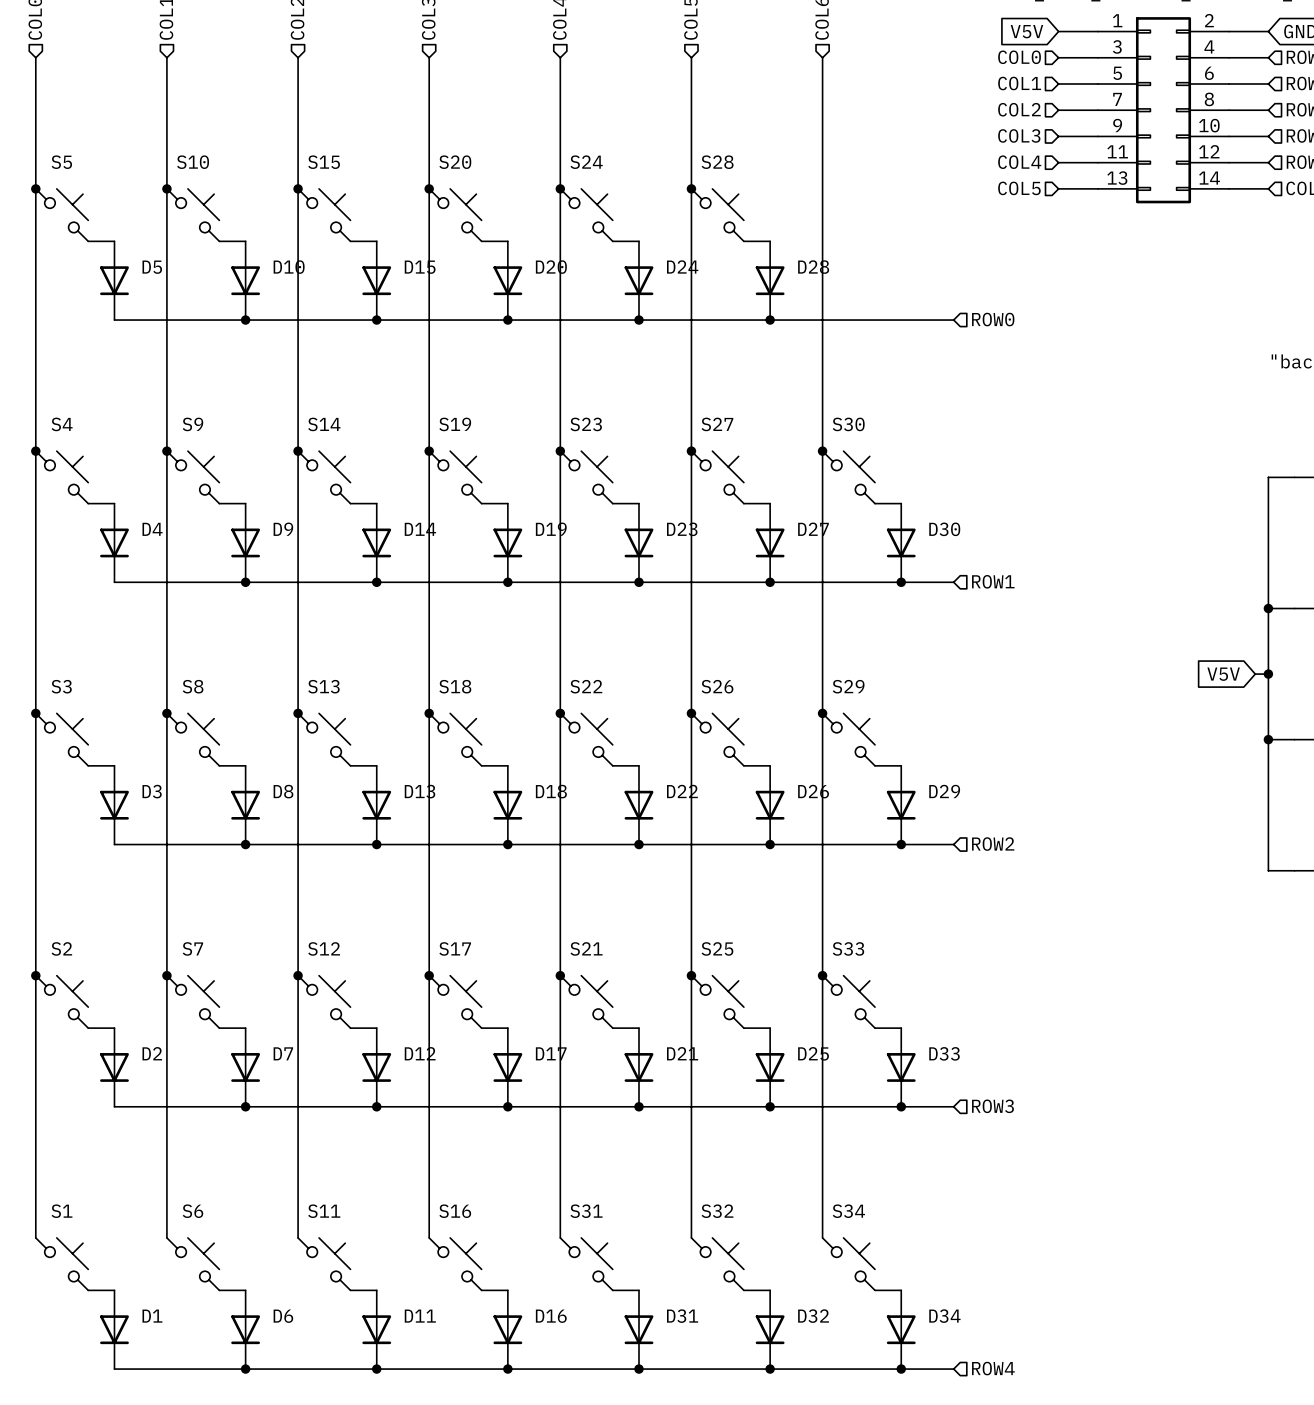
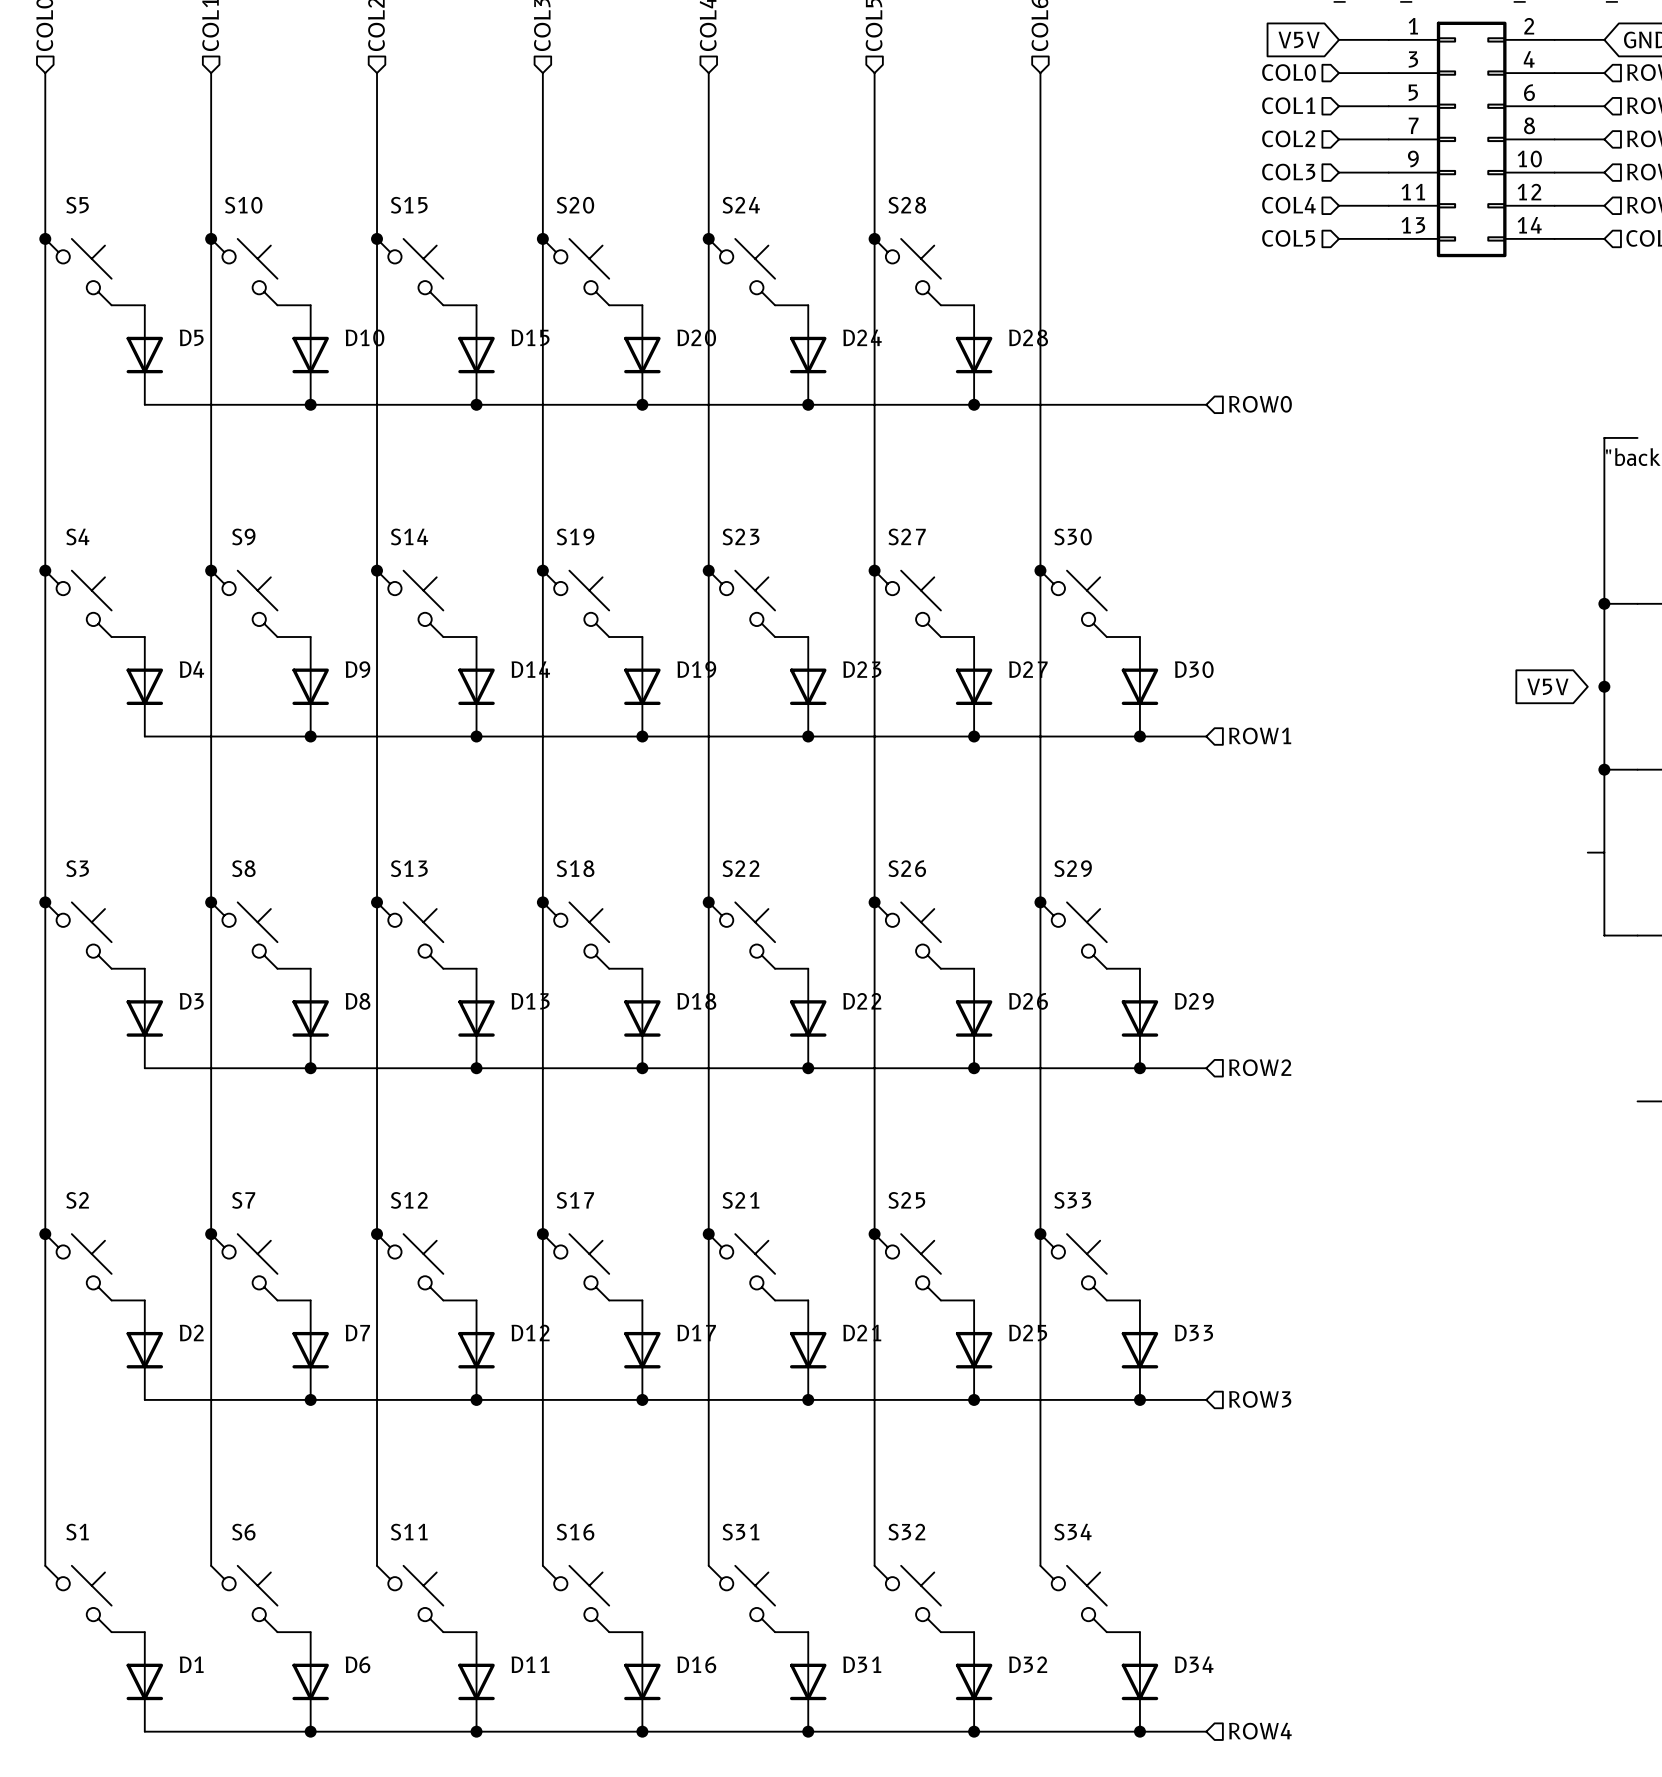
wire: none -> (1637, 437) (1604, 437) (1604, 603)
junction: none -> (1604, 603)
junction: none -> (1604, 686)
global label: none -> V5V (1547, 686)
global label: V5V (1223, 674) -> none
junction: (1268, 674) -> none
wire: (1268, 739) (1268, 870) (1294, 870) -> none
junction: (1268, 739) -> none

